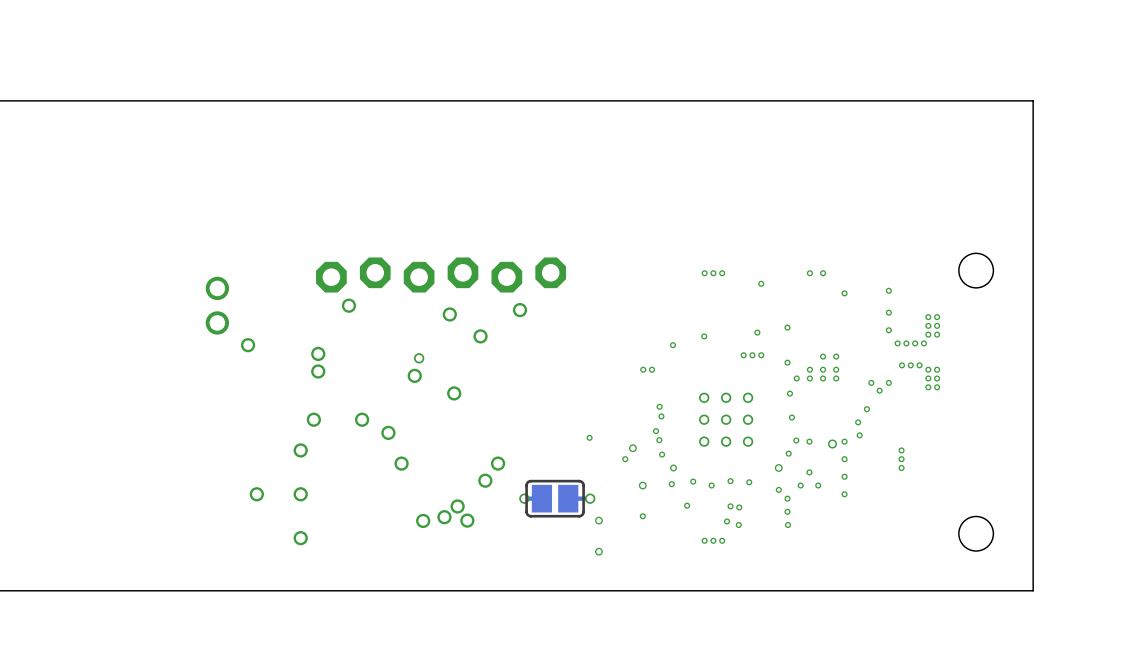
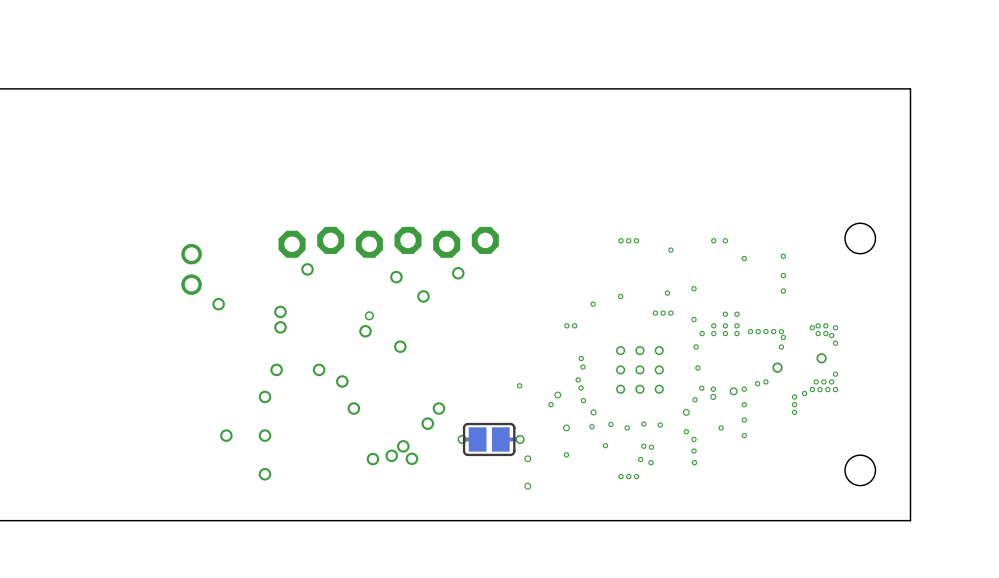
via: (928, 317) -> none
via: (937, 317) -> none
via: (928, 325) -> none
via: (937, 325) -> none
via: (928, 334) -> none
via: (937, 334) -> none
via: (897, 343) -> none
via: (906, 343) -> none
via: (915, 343) -> none
via: (923, 343) -> none
via: (902, 365) -> none
via: (910, 365) -> none
via: (919, 365) -> none
via: none -> (812, 327)
via: none -> (835, 327)
via: none -> (750, 331)
via: none -> (758, 331)
via: none -> (765, 331)
via: none -> (773, 331)
via: none -> (781, 331)
via: none -> (831, 335)
via: (871, 382) -> none
via: (928, 387) -> none
via: (937, 387) -> none
via: none -> (835, 343)
via: (879, 390) -> none
via: none -> (781, 347)
via: none -> (821, 358)
via: (866, 409) -> none
via: none -> (777, 367)
via: (858, 422) -> none
via: none -> (835, 374)
via: none -> (765, 381)
via: none -> (816, 381)
via: none -> (823, 381)
via: none -> (831, 381)
via: none -> (812, 389)
via: none -> (820, 389)
via: none -> (827, 389)
via: none -> (835, 389)
via: none -> (804, 393)
via: none -> (713, 396)
via: (809, 472) -> none
via: (800, 485) -> none

